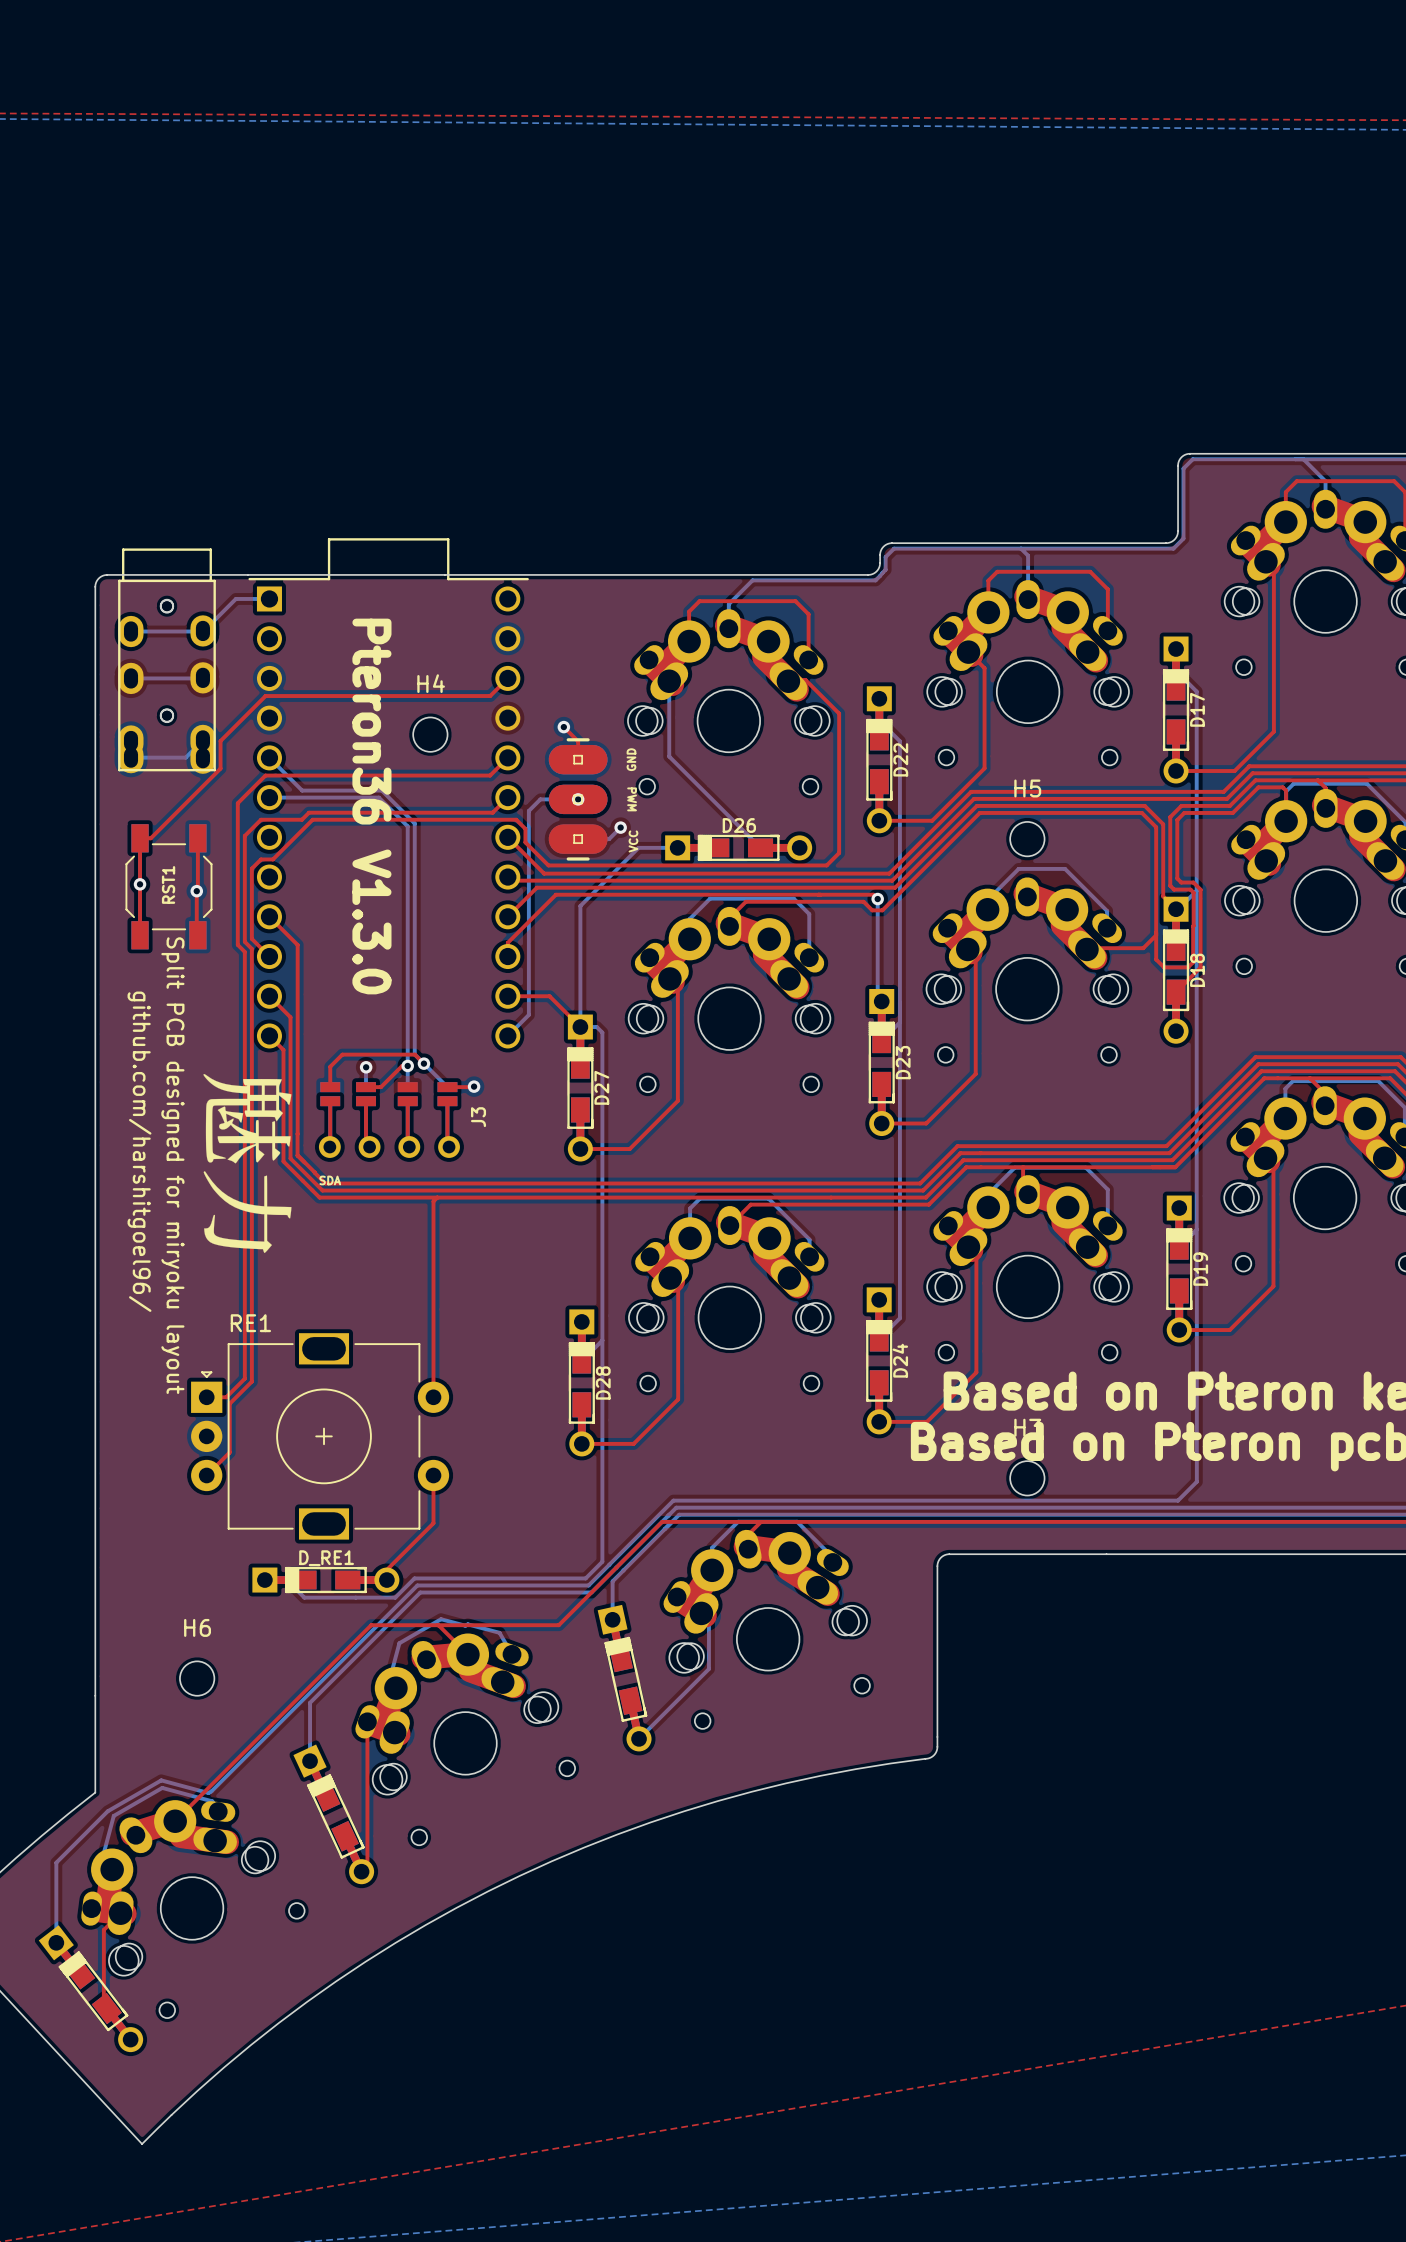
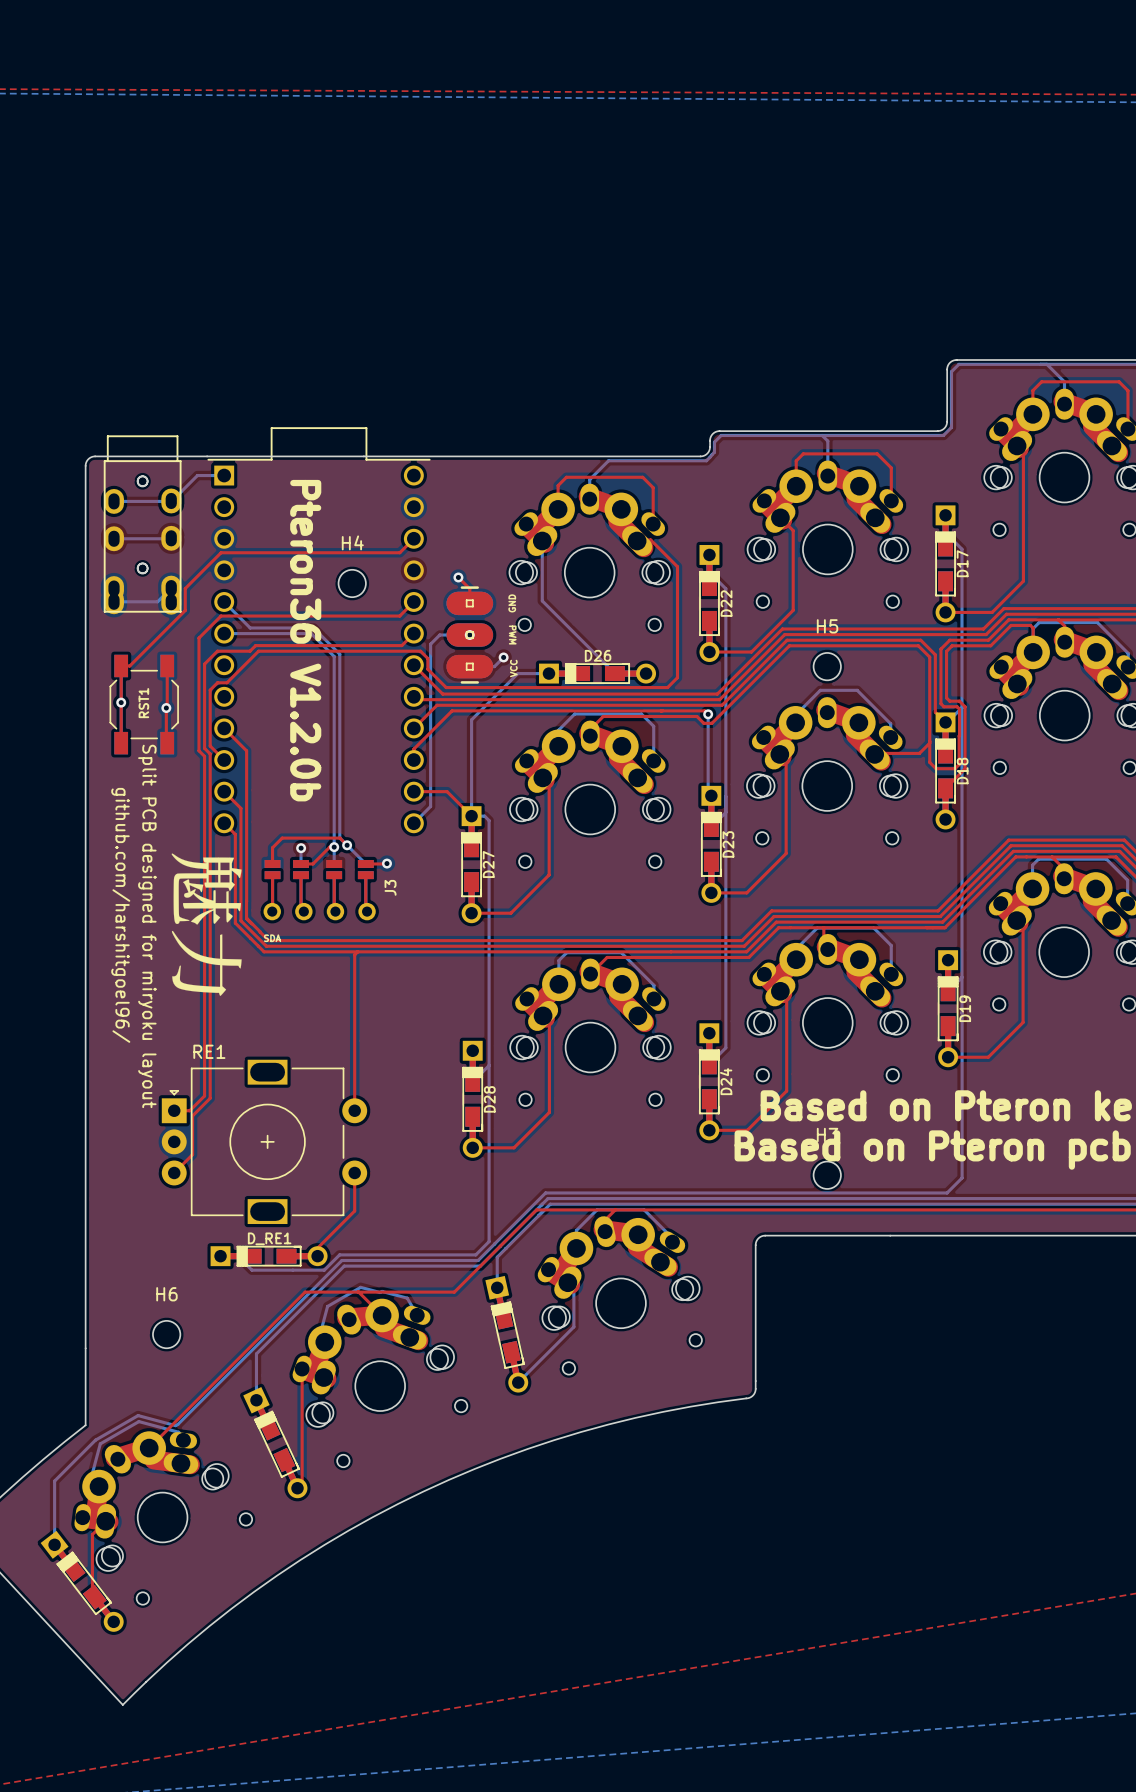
text: Pteron36 V1.3.0 (371, 806) -> Pteron36 V1.2.0b (305, 640)

